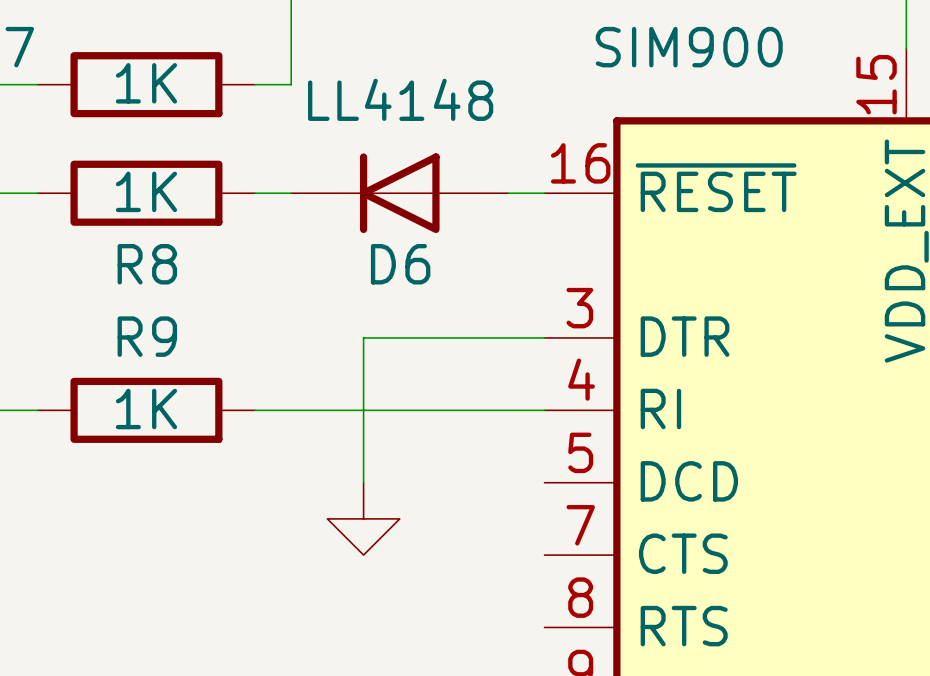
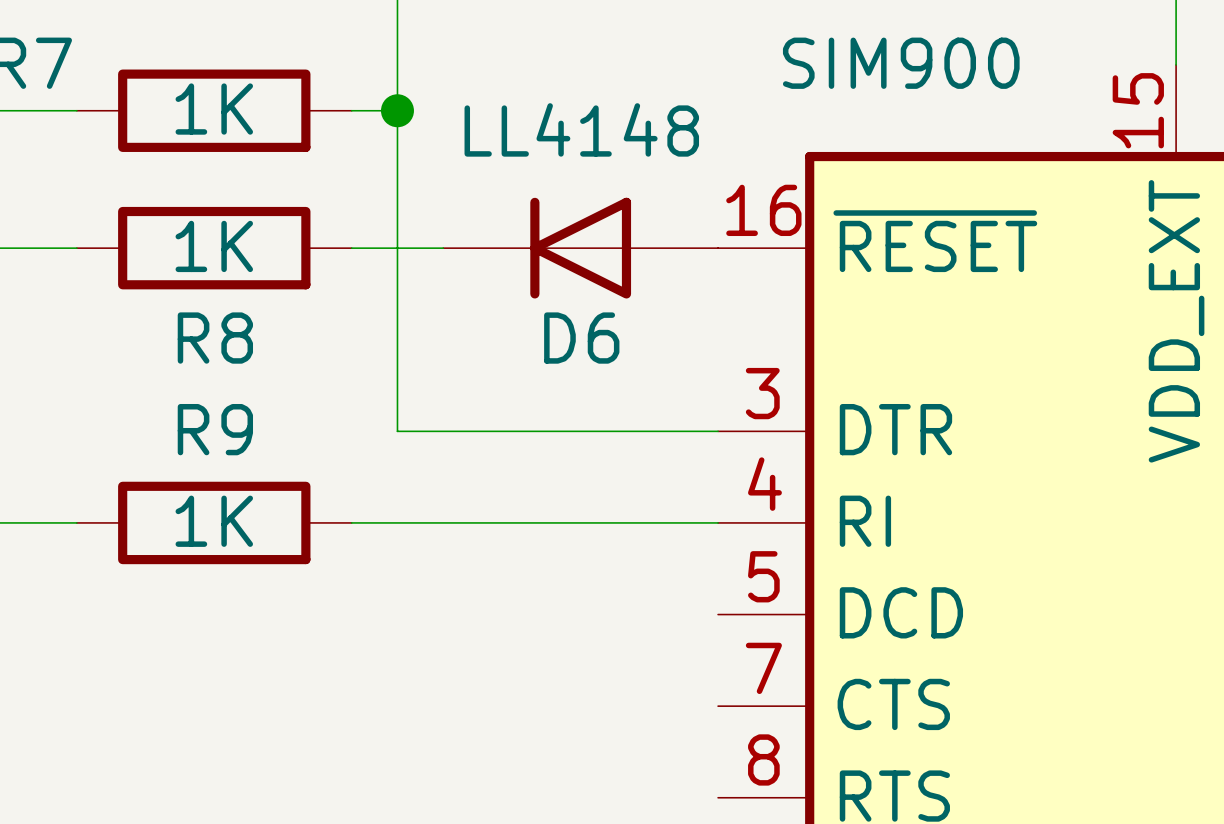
junction: none -> (397, 110)
D6 position: (399, 193) -> (580, 248)
wire: (363, 337) (363, 482) -> (489, 431) (397, 431) (397, 110)
power symbol: (363, 518) -> none

